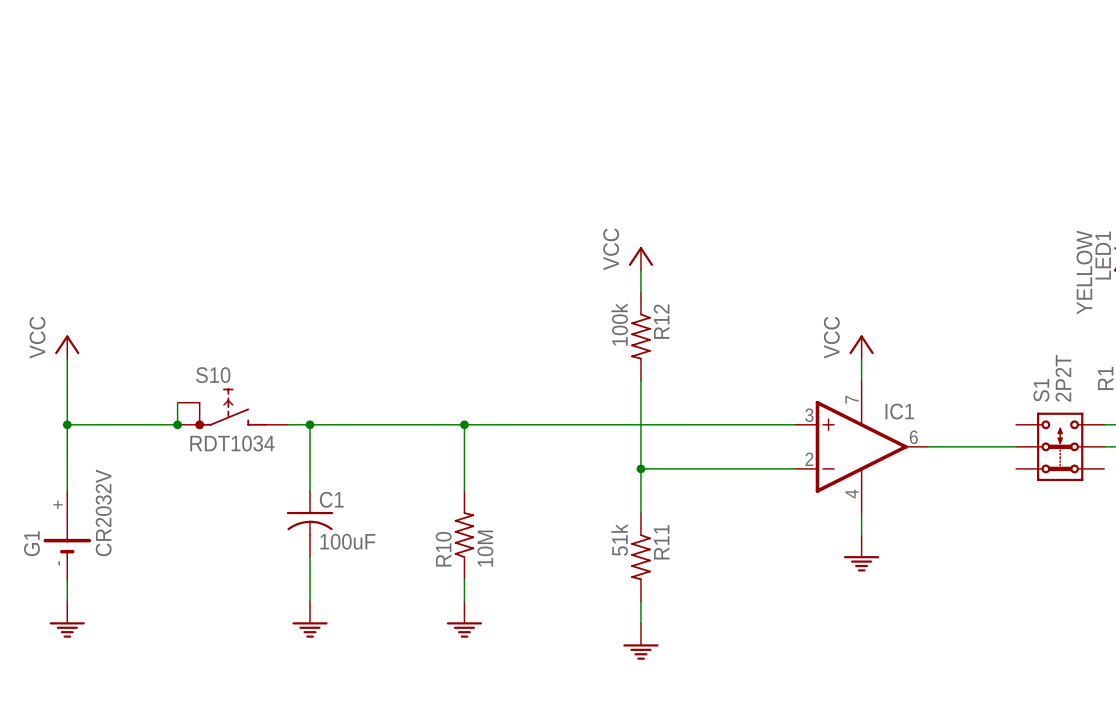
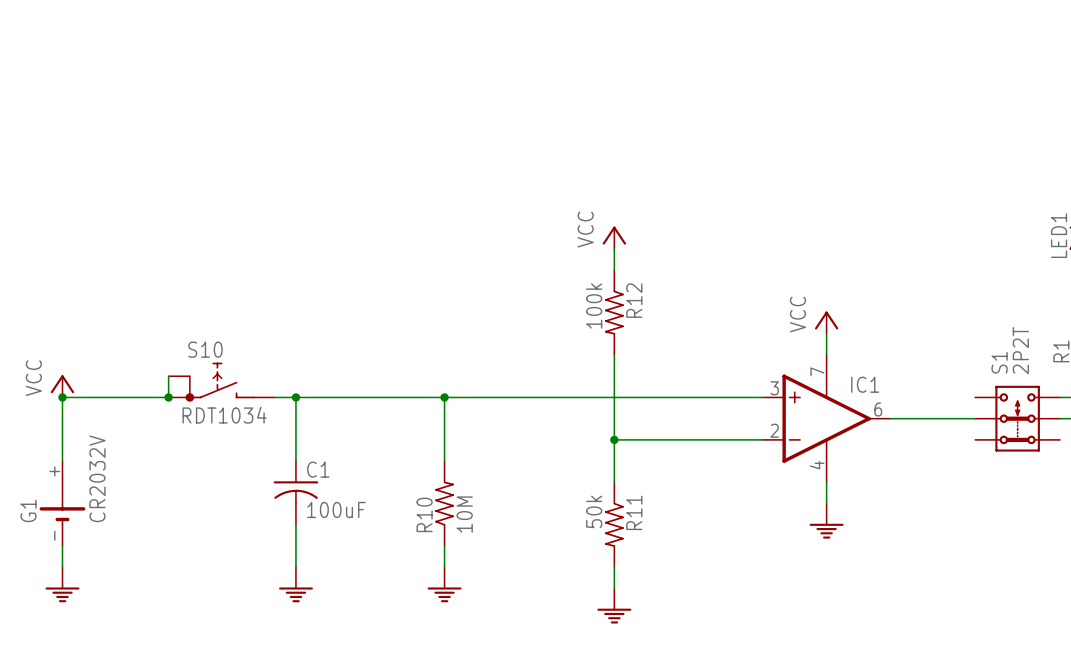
LED1 value: YELLOW (1084, 272) -> none
power symbol position: VCC (67, 347) -> VCC (62, 386)
wire: (67, 358) (67, 424) -> none
R11 value: 51k (619, 539) -> 50k (594, 511)

